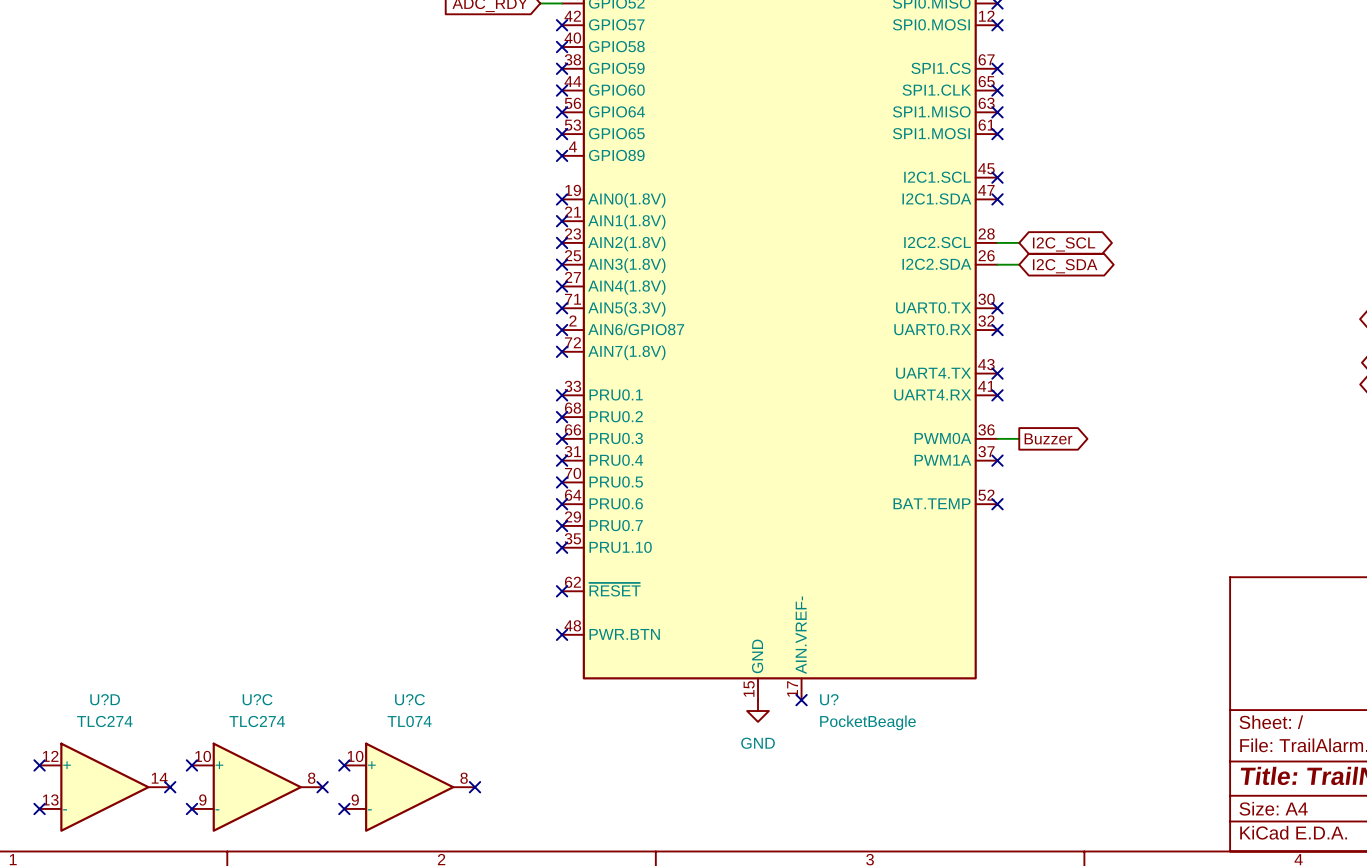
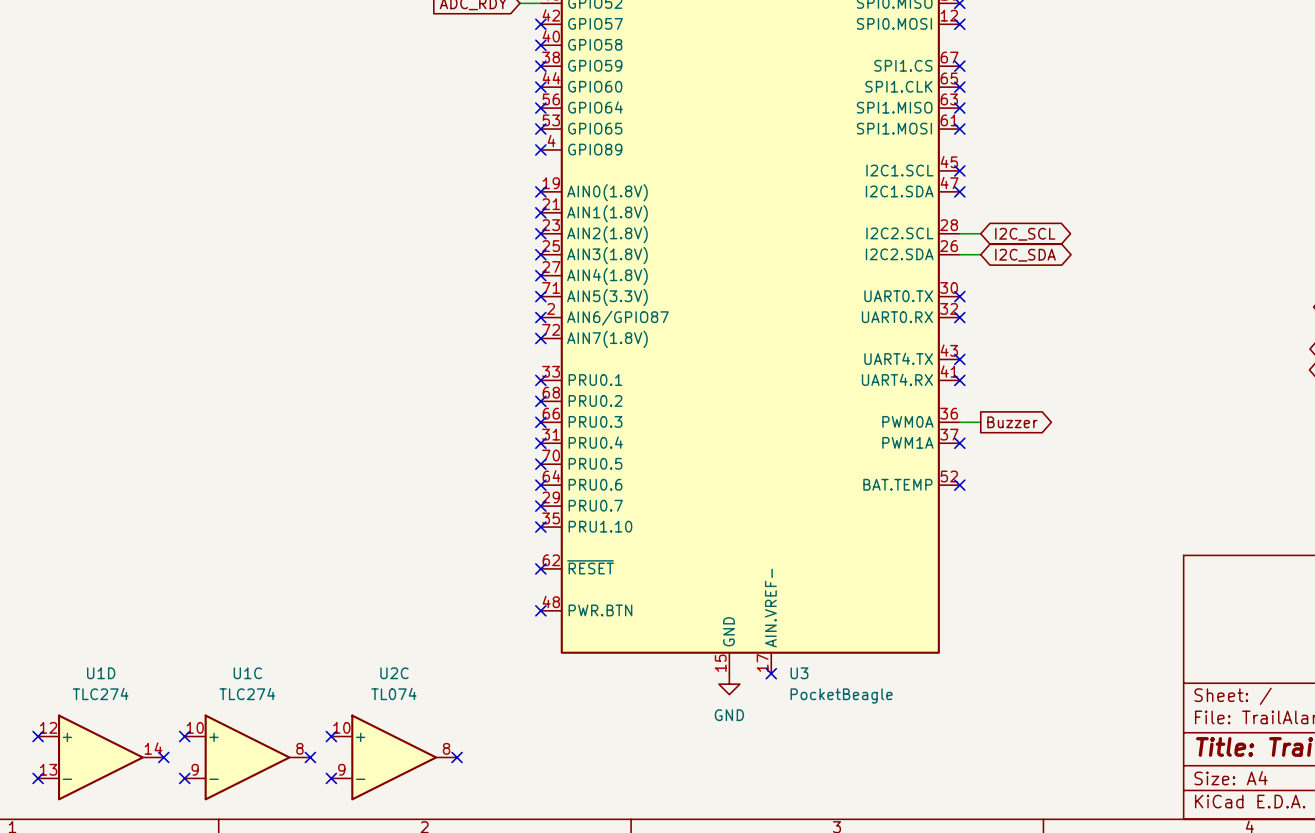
U?D name: U?D (105, 699) -> U1D (101, 673)
U?C name: U?C (257, 699) -> U1C (247, 673)
U?C name: U?C (409, 699) -> U2C (394, 673)
U? name: U? (829, 699) -> U3 (799, 673)

